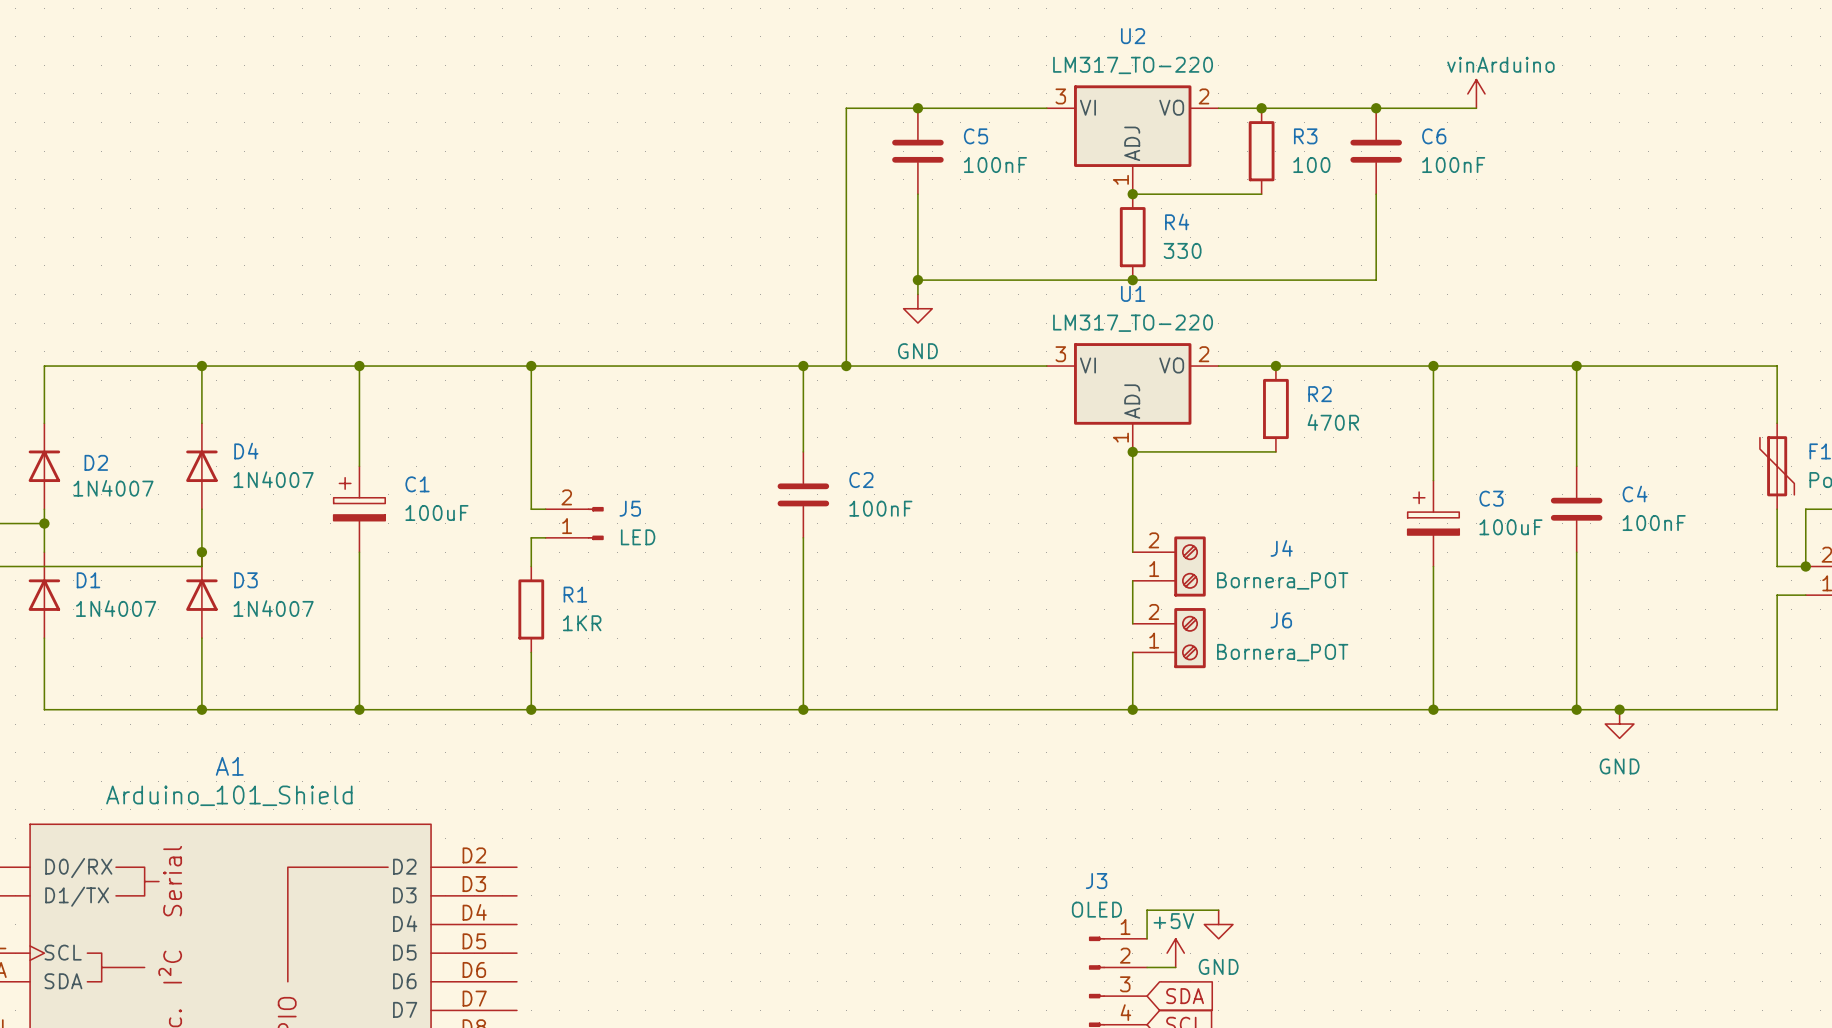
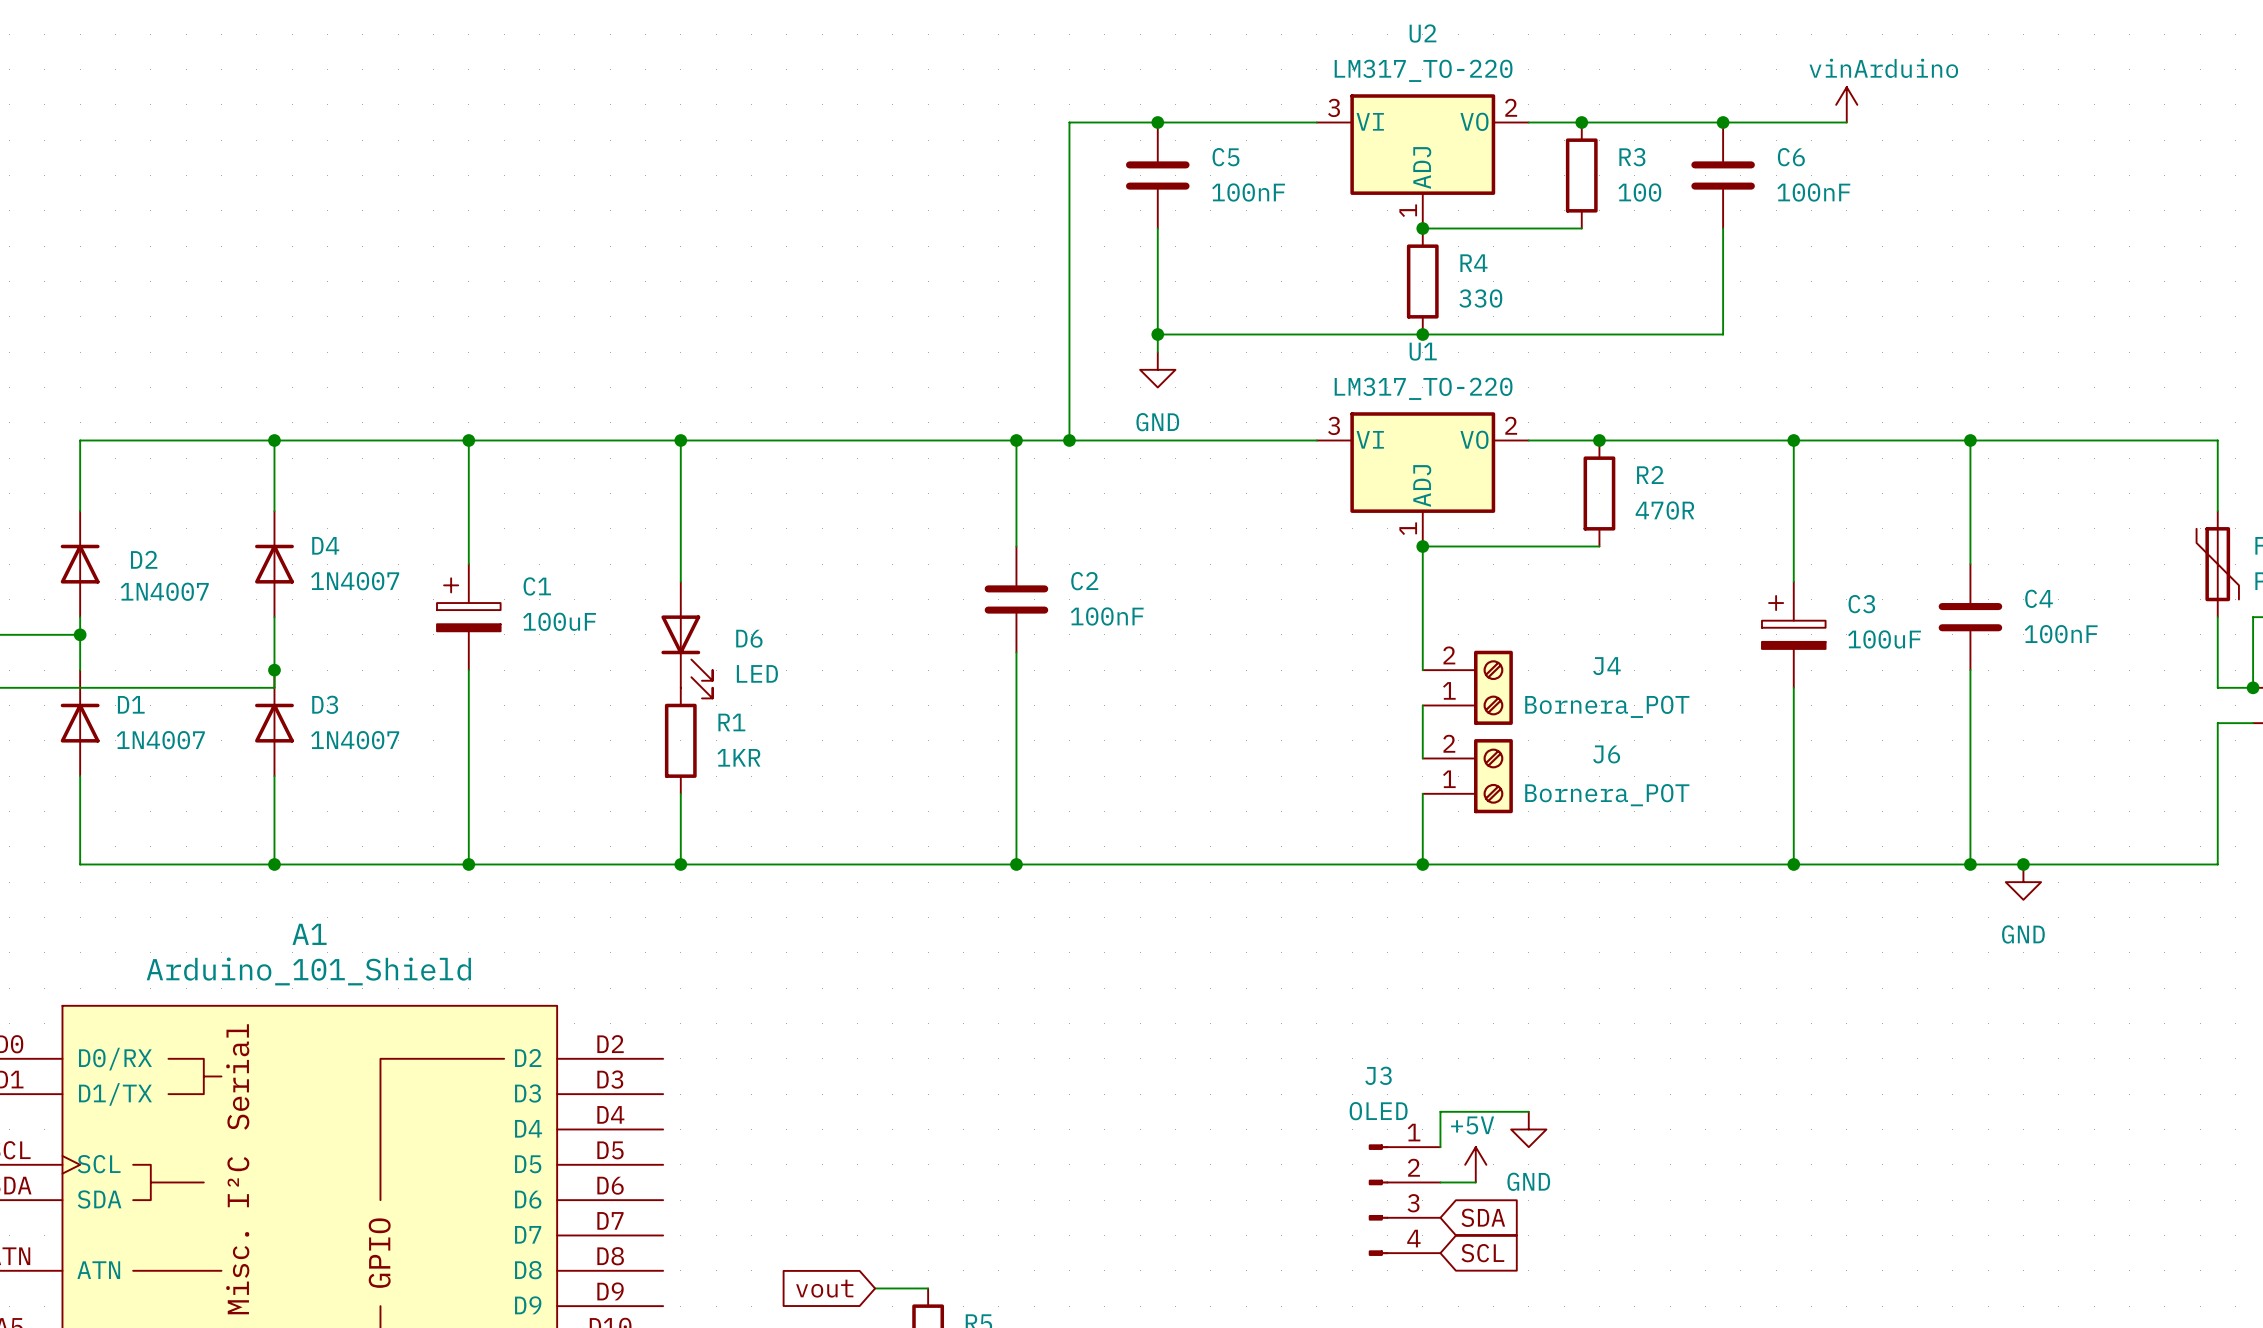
J5: LED (574, 523) -> none
D6: none -> LED (686, 640)

